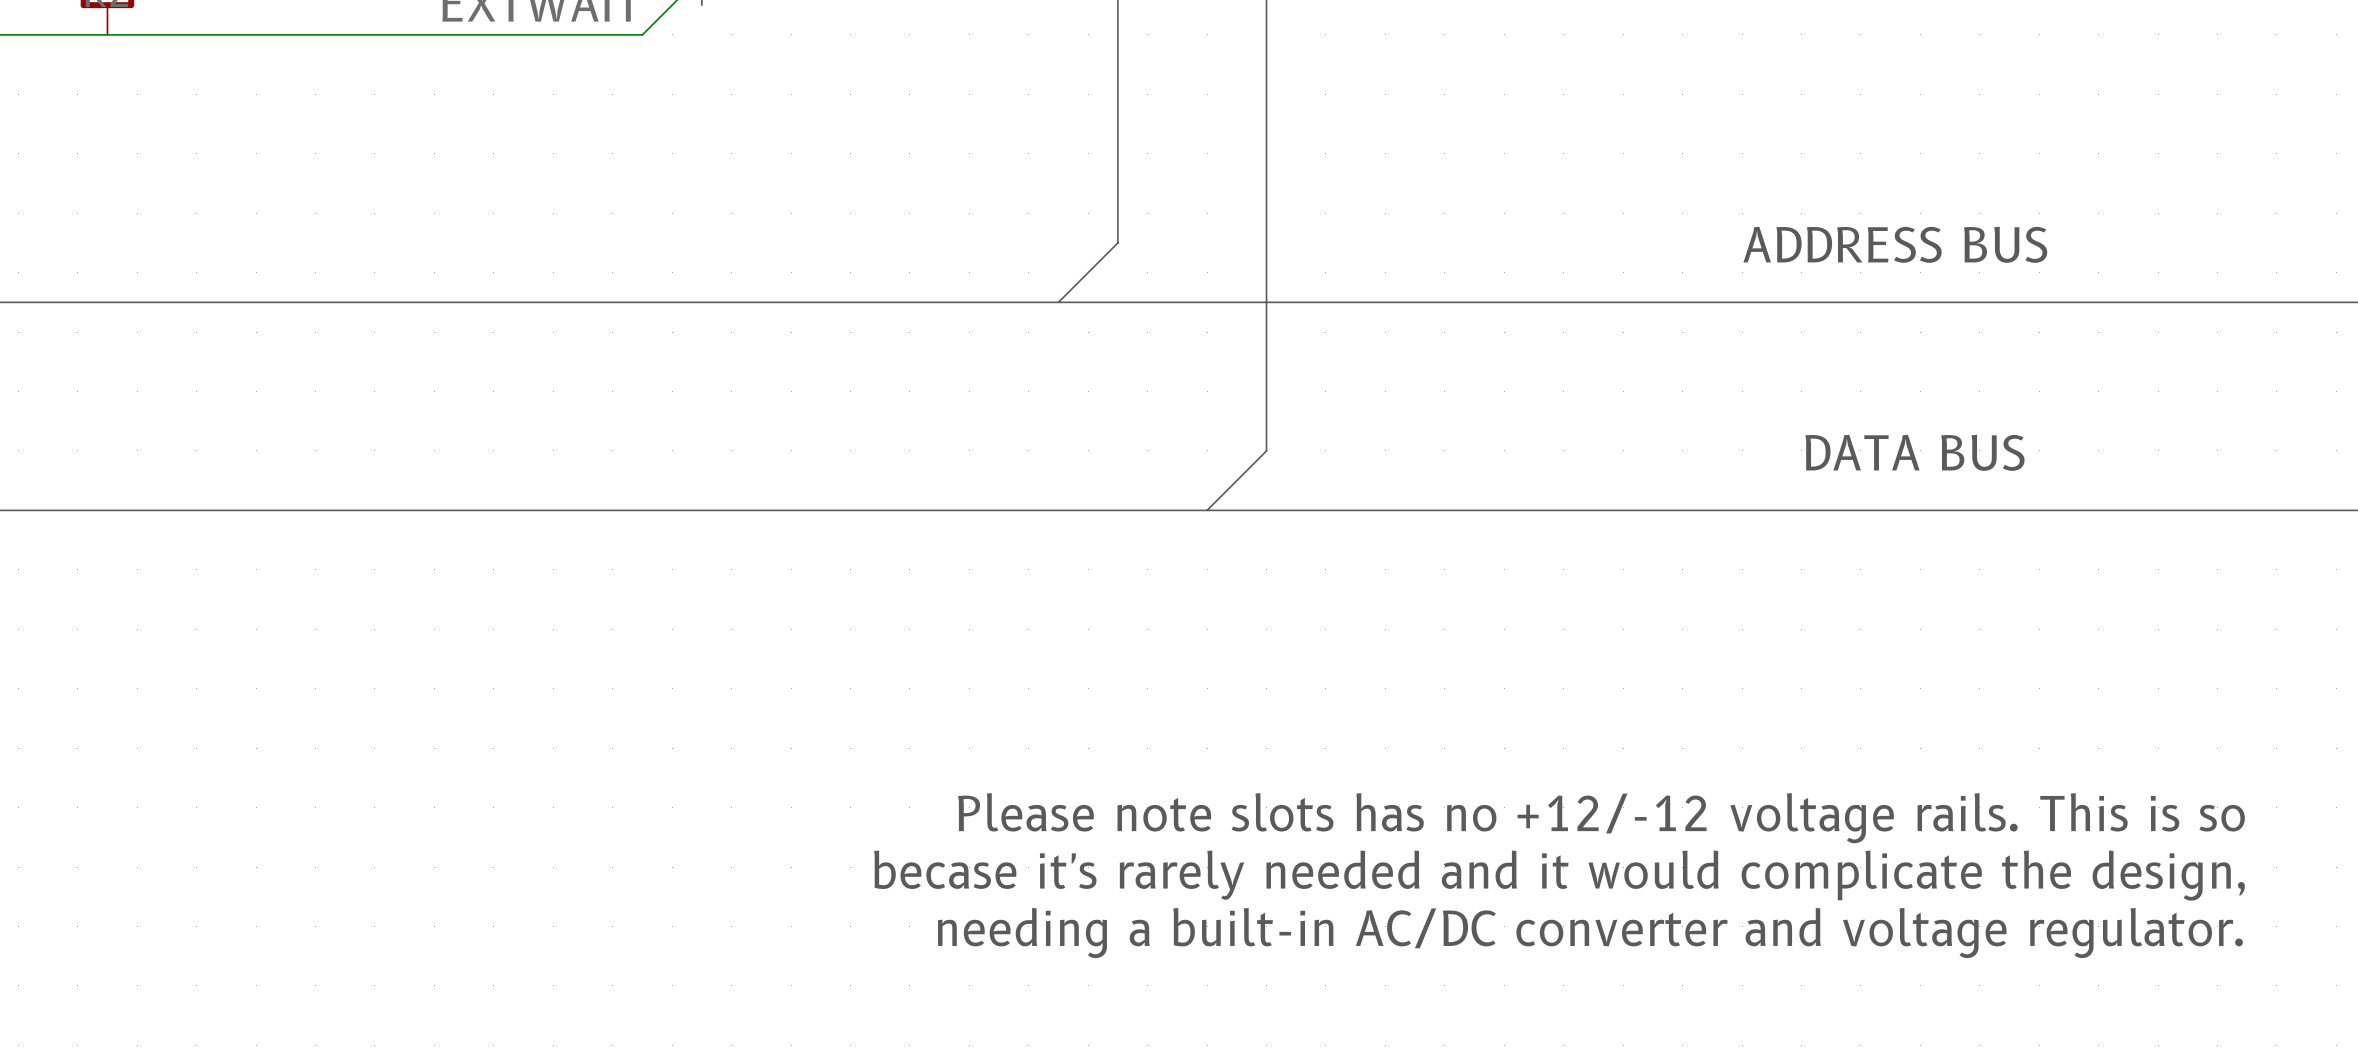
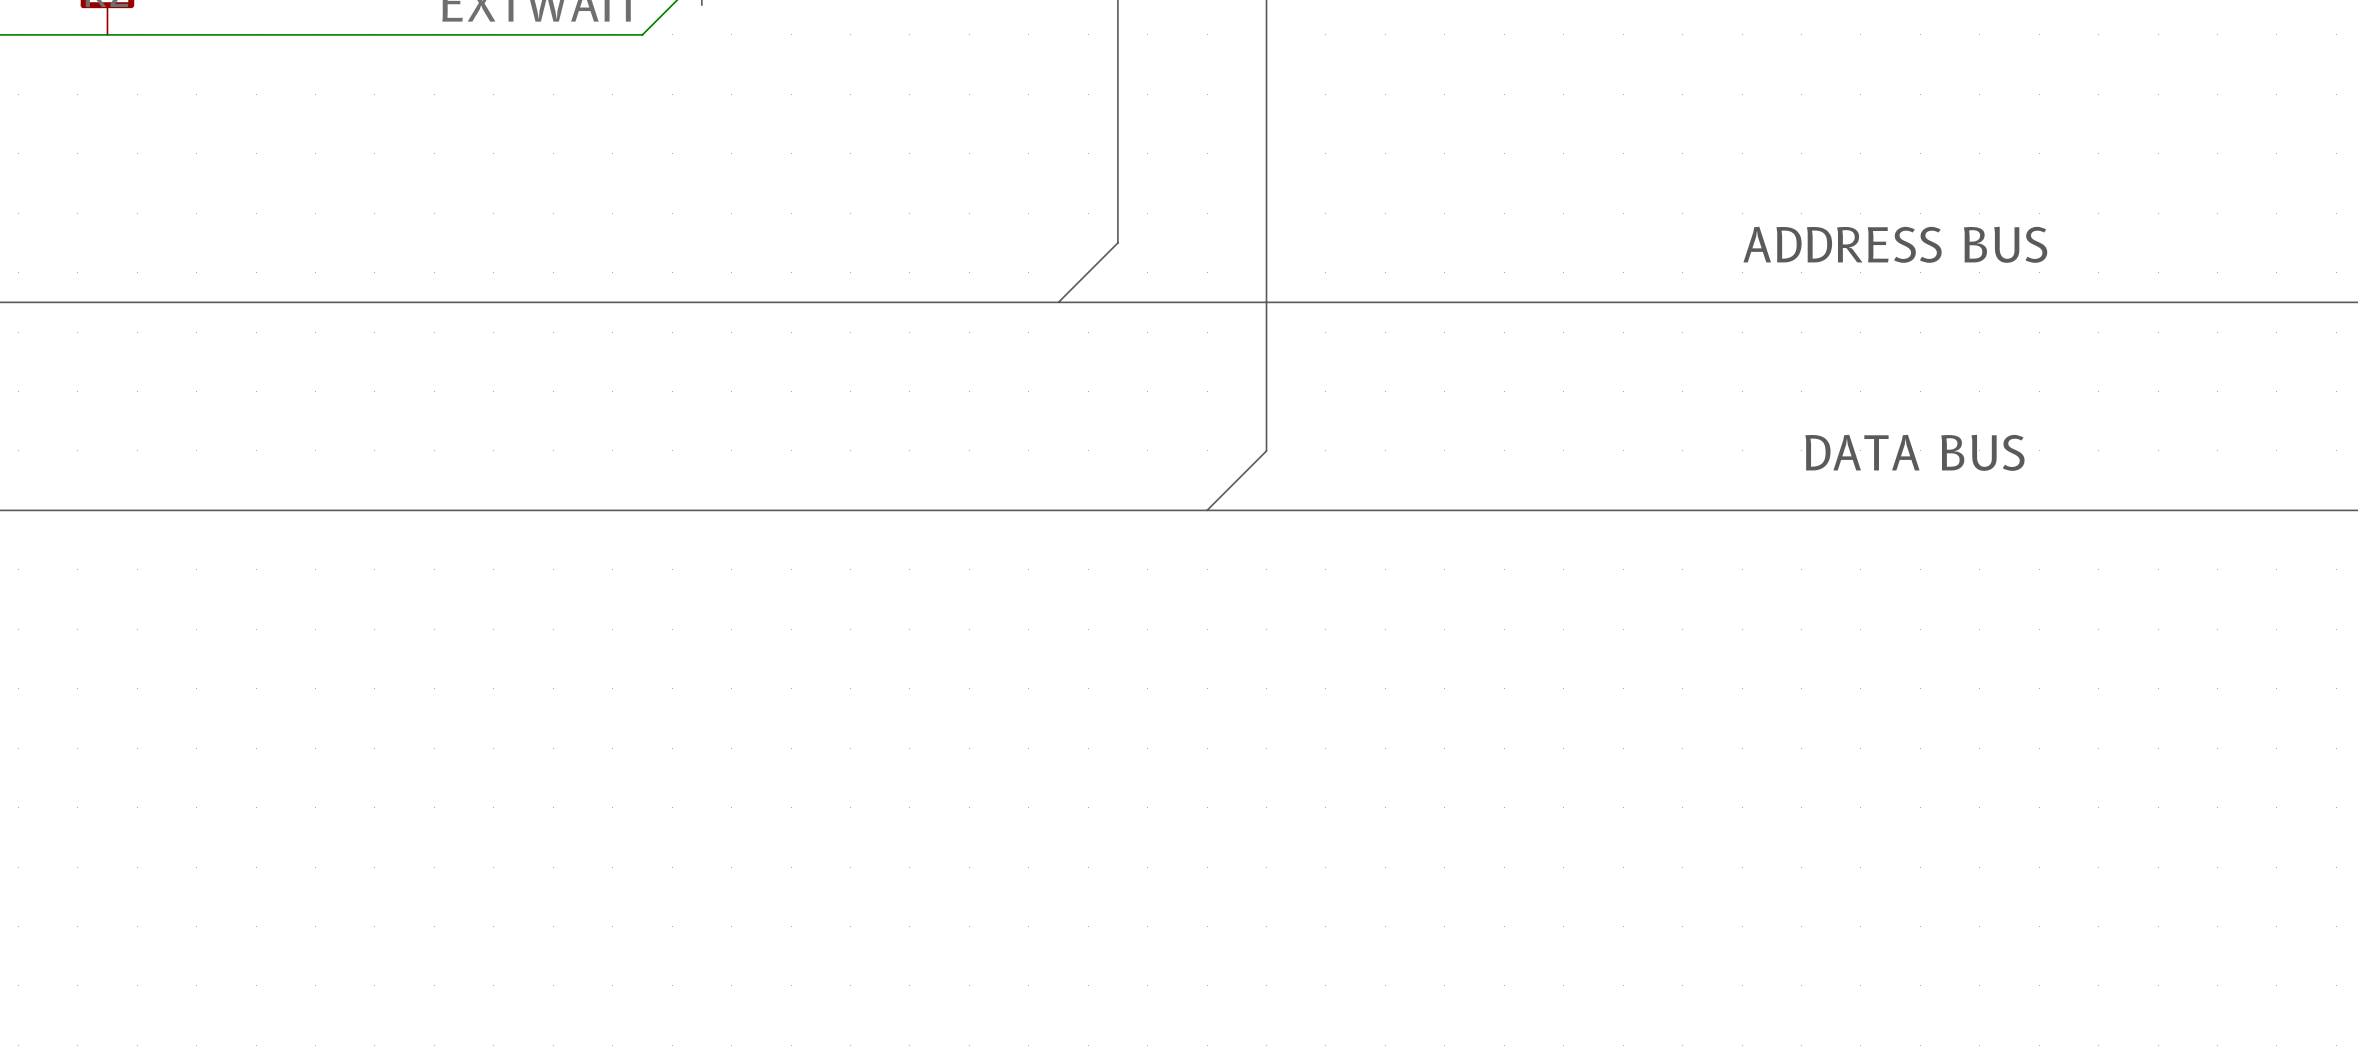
text: Please note slots has no +12/-12 voltage rails. This is so (1601, 818) -> none
text: becase it's rarely needed and it would complicate the design, (1559, 875) -> none
text: needing a built-in AC/DC converter and voltage regulator. (1590, 933) -> none

